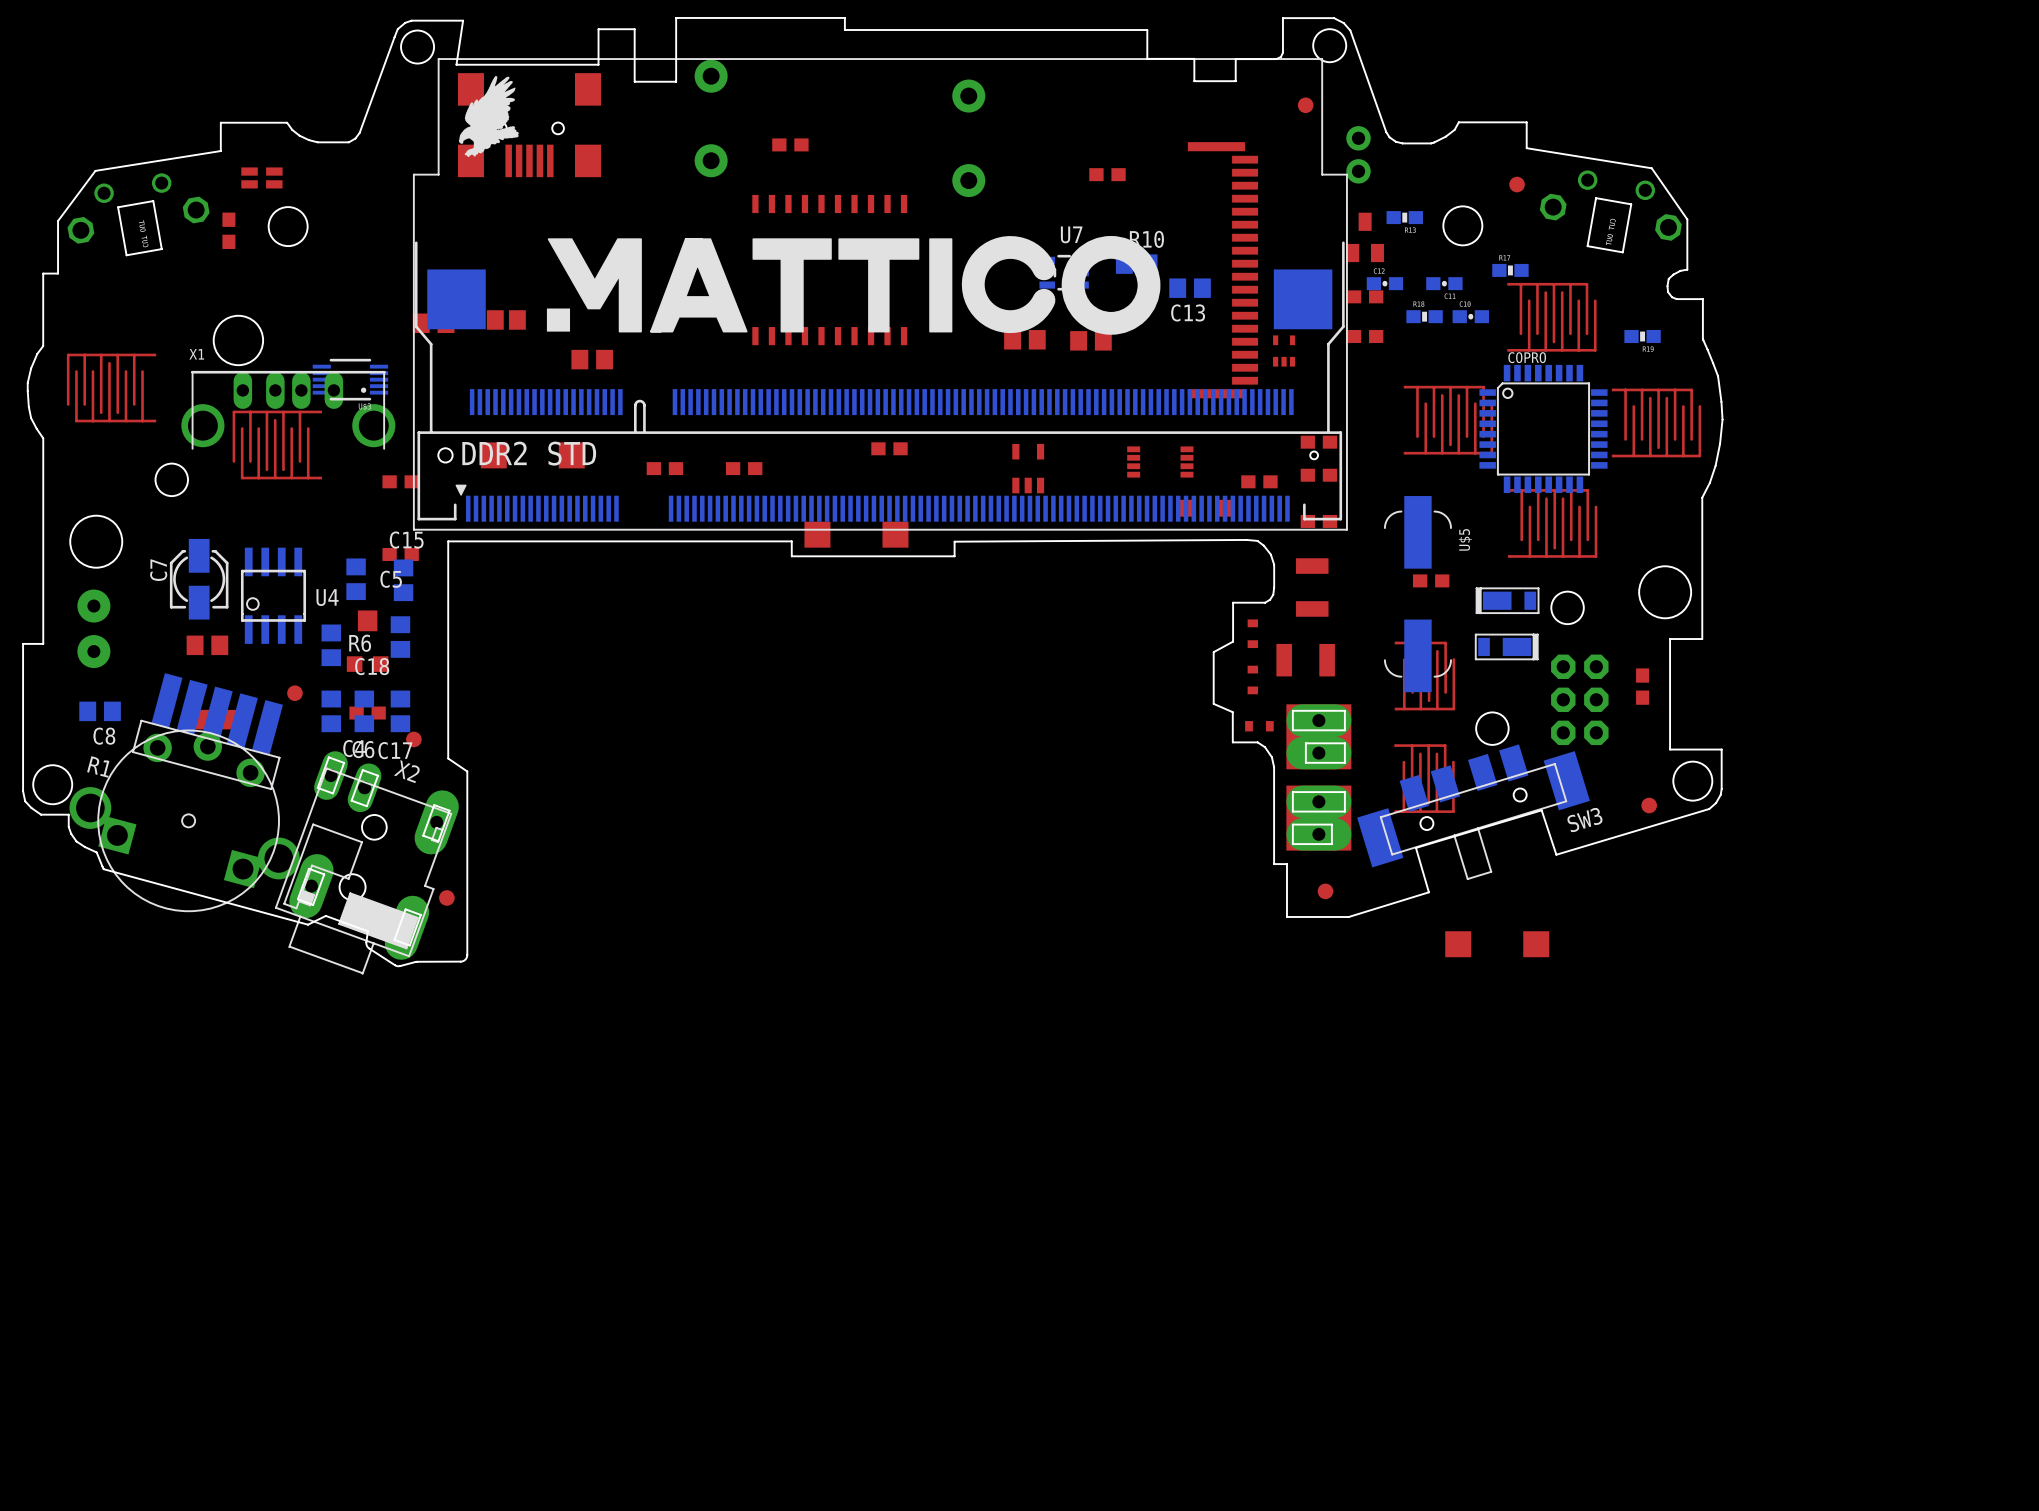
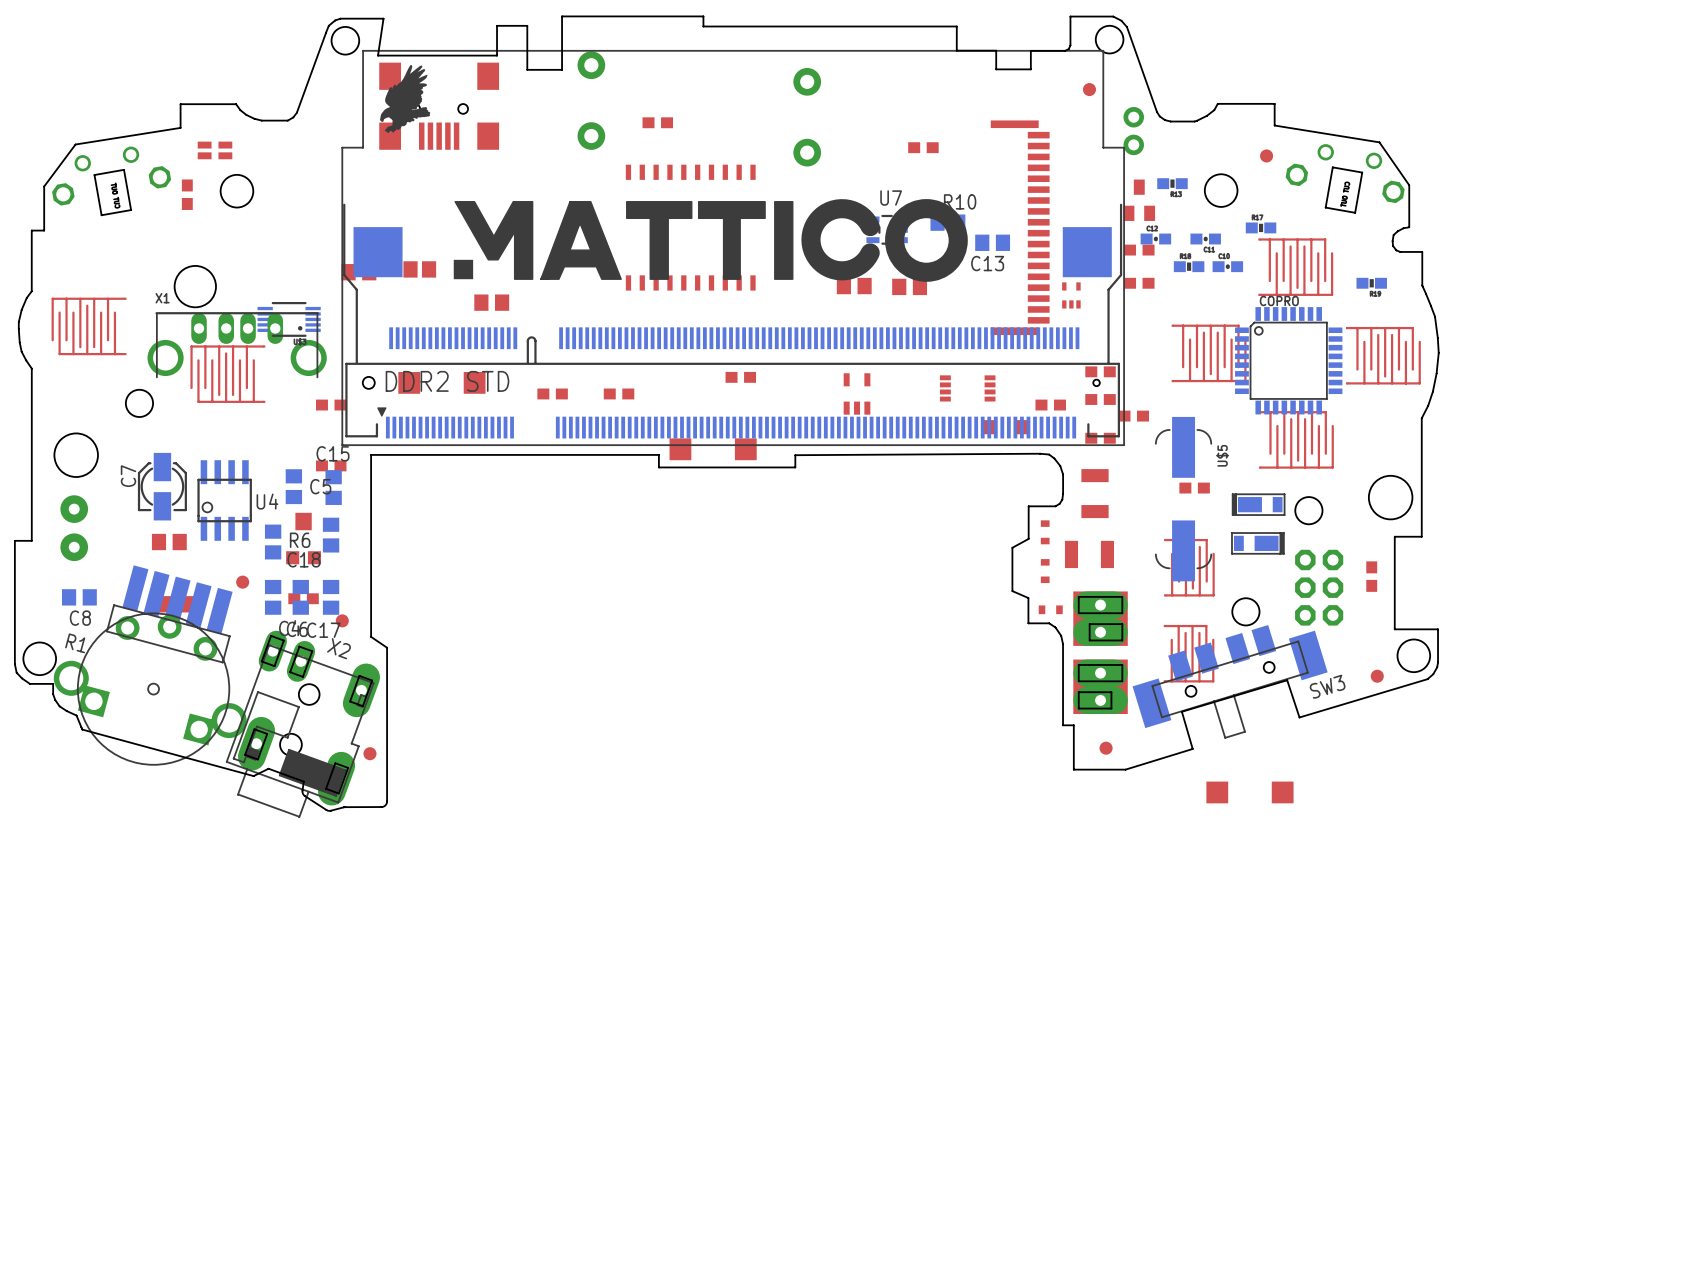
part: none -> (1133, 416)

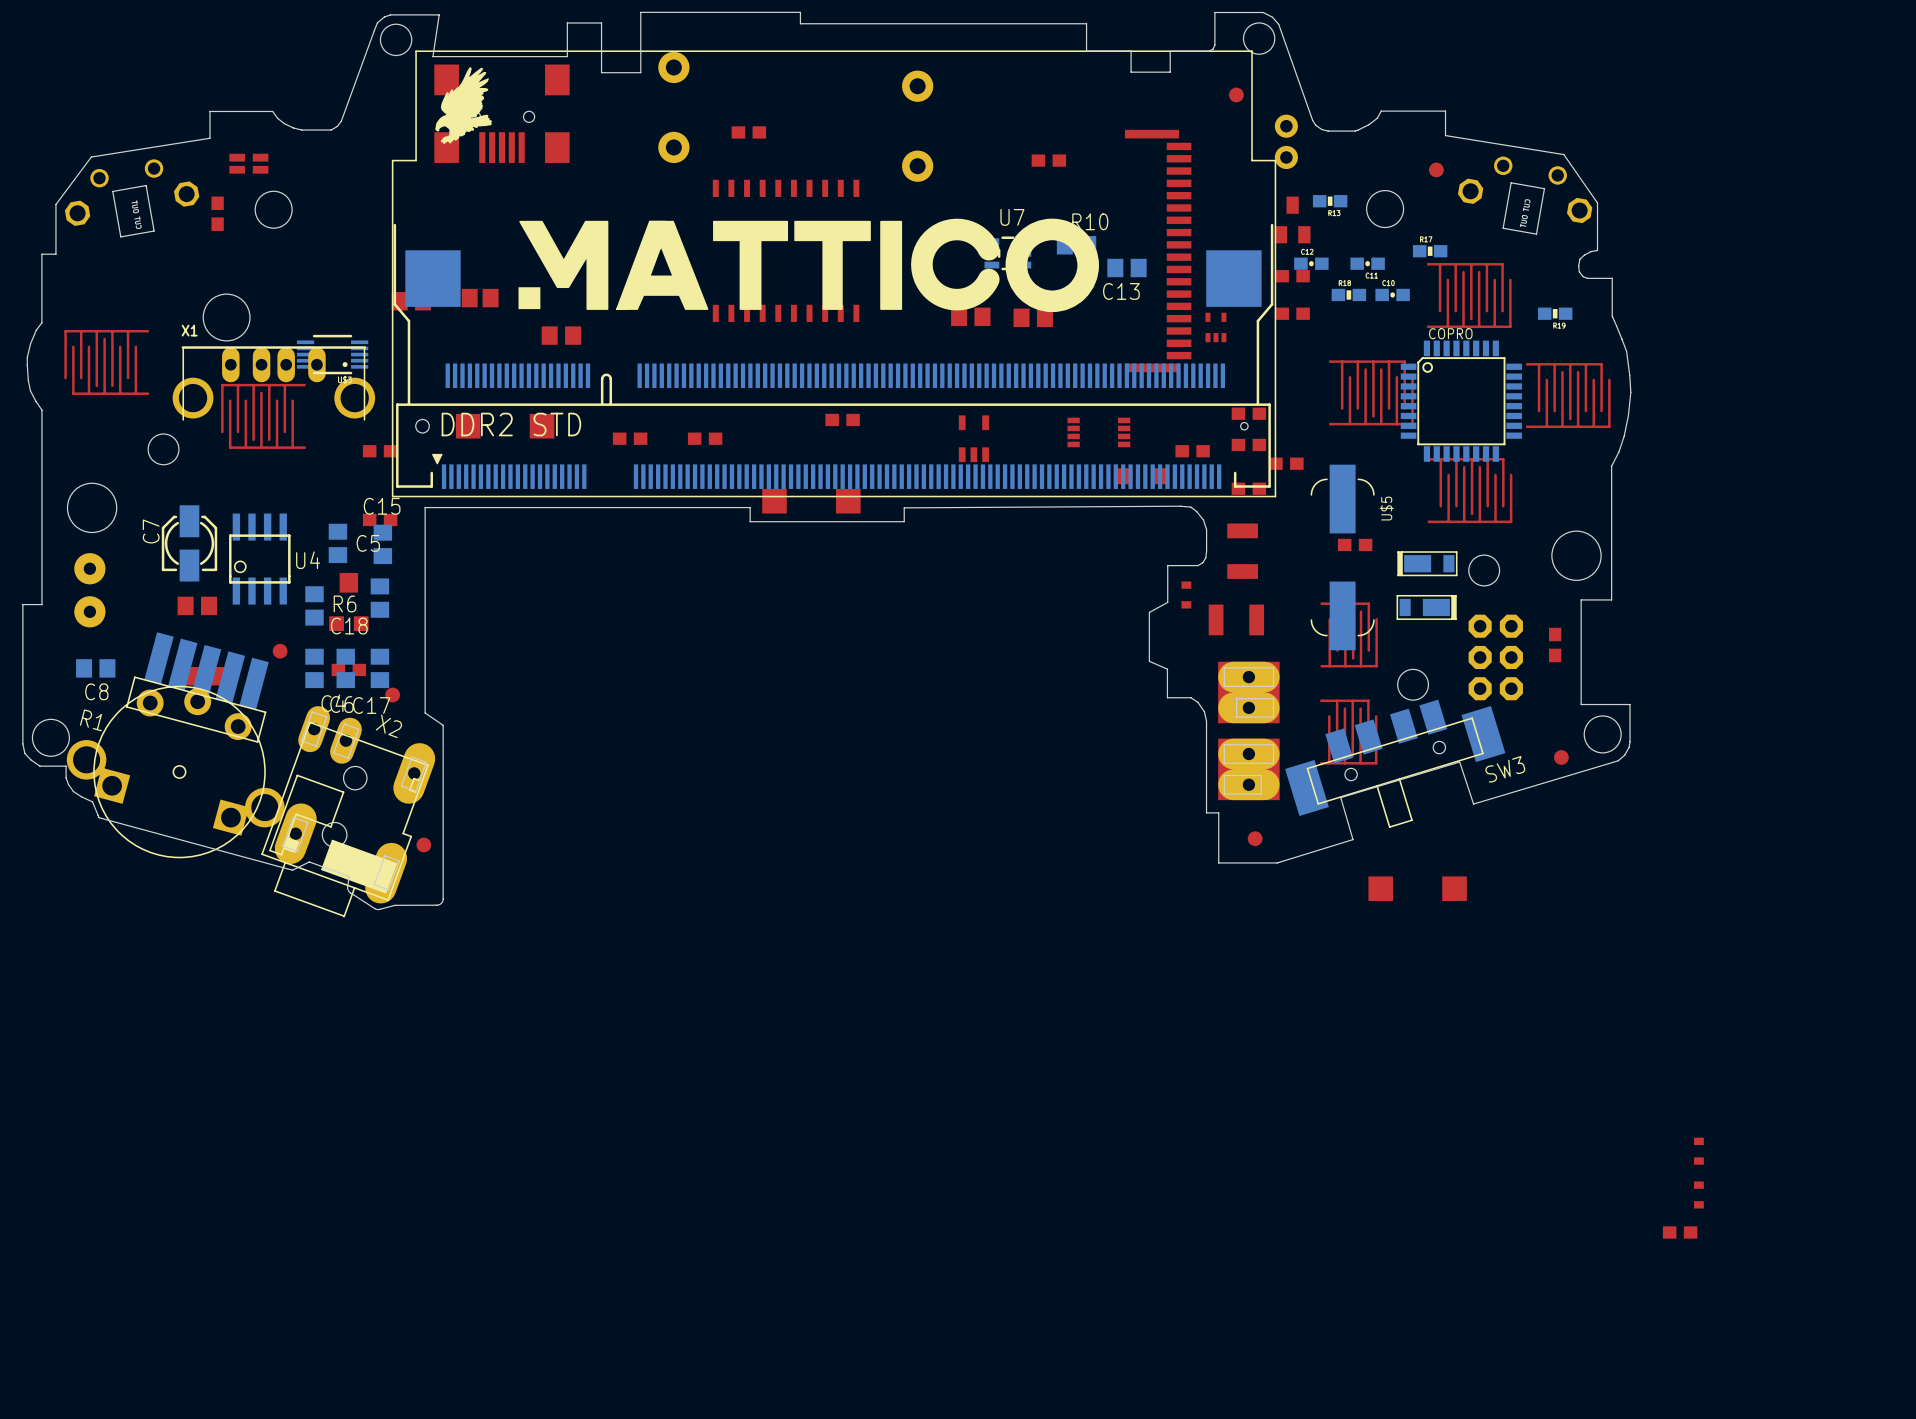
part: (1045, 571) -> none
part: (1050, 609) -> none
part: none -> (1698, 1151)
part: none -> (1698, 1194)
part: none -> (1680, 1232)

